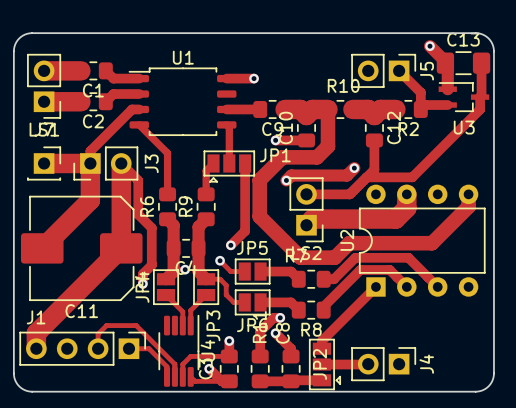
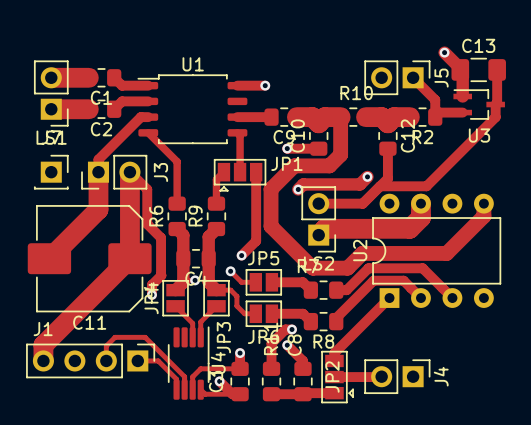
board edge: (32, 33) (475, 33) (486, 36) (492, 44) (493, 51) (493, 373) (490, 384) (482, 390) (475, 391) (32, 391) (21, 387) (15, 380) (13, 373) (13, 51) (19, 38) (32, 33) -> none
track: (44, 163) (90, 163) -> none

